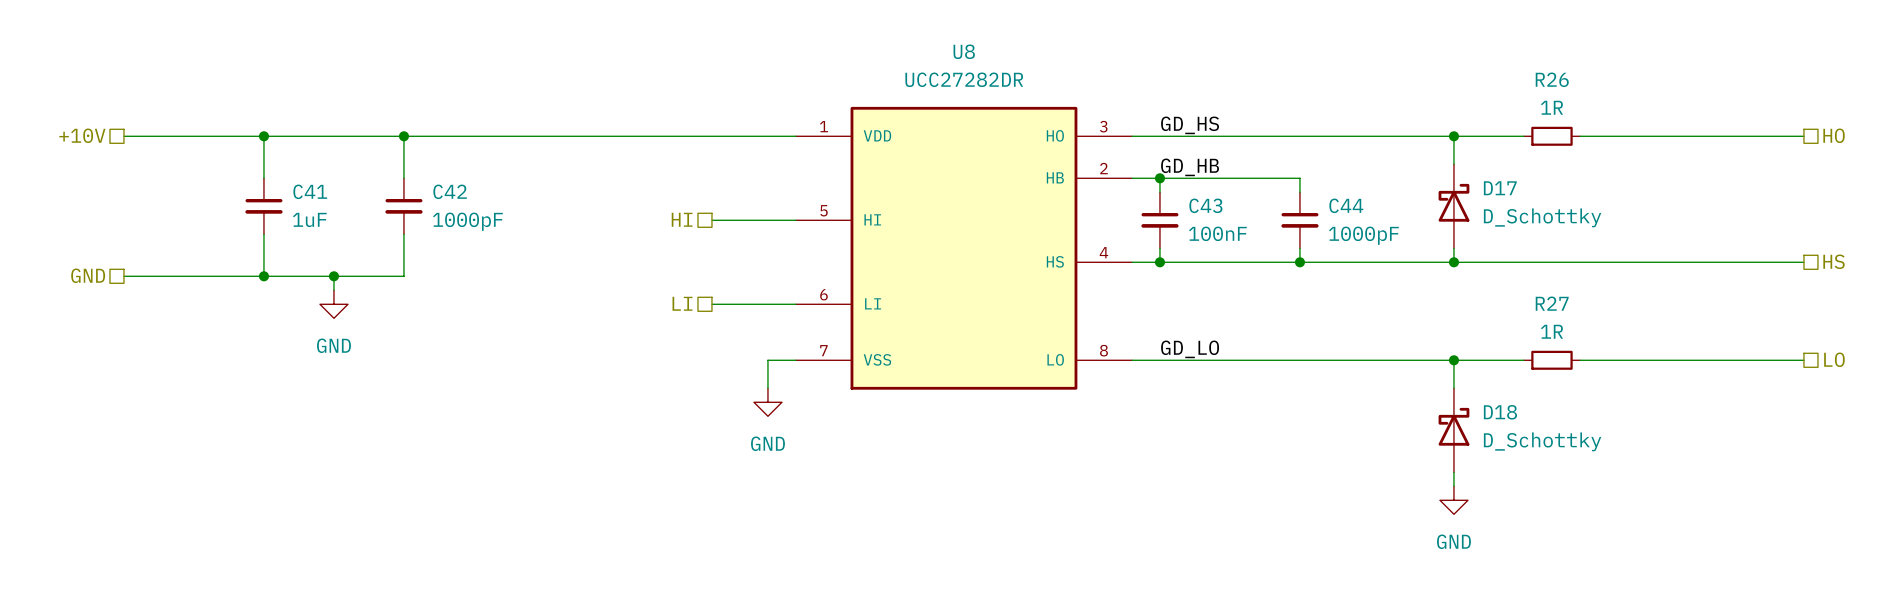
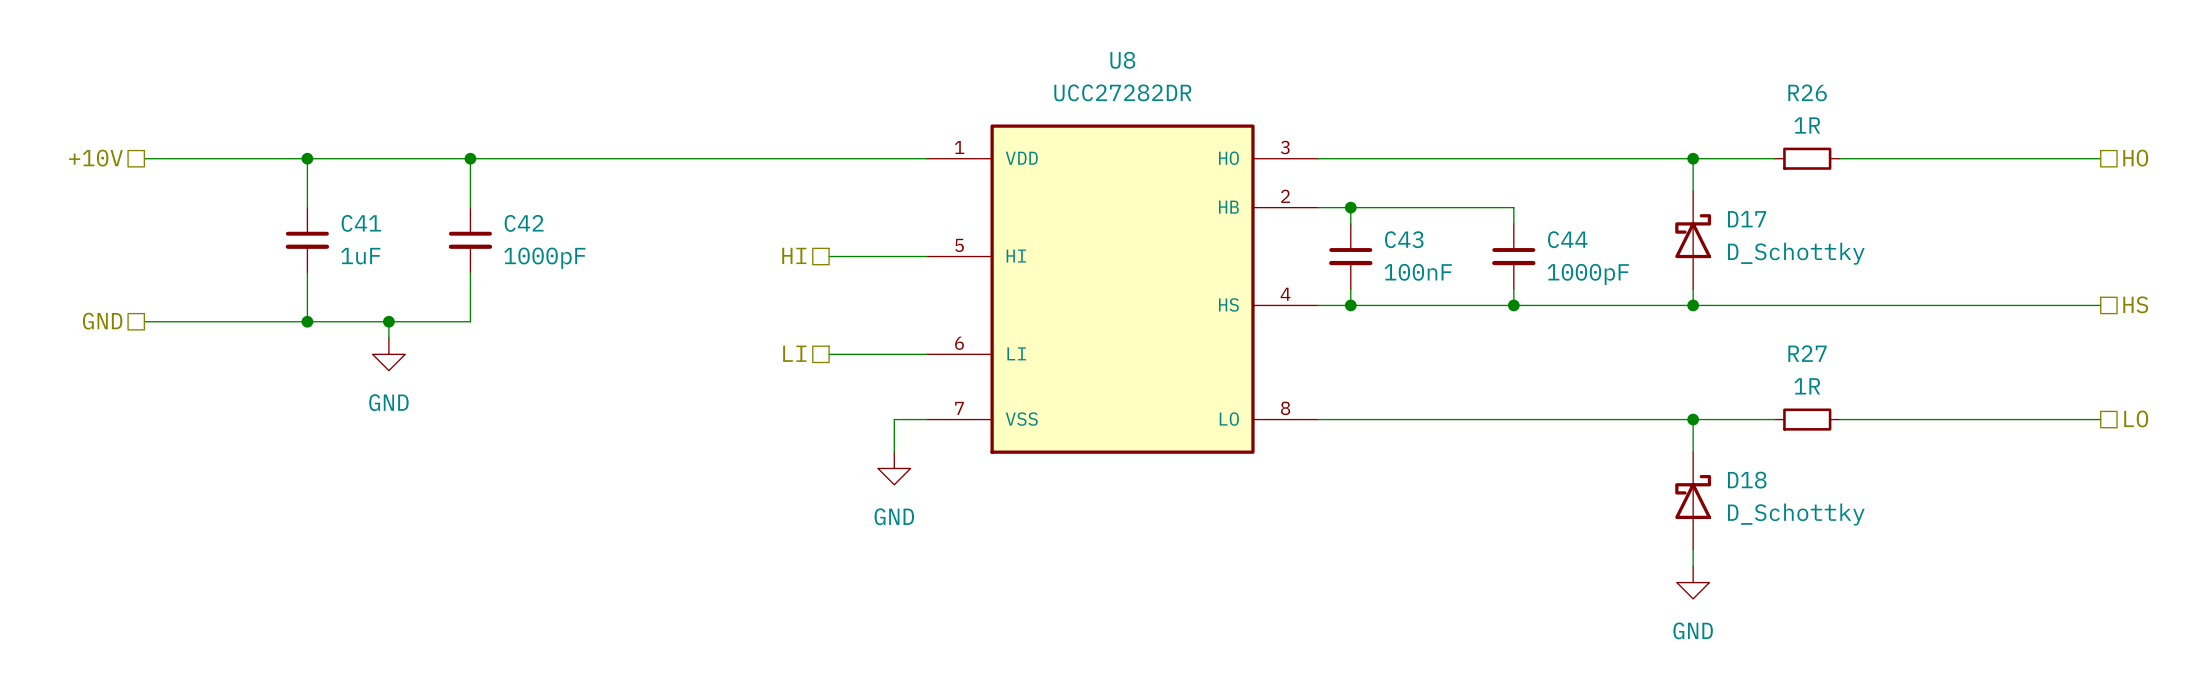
label: GD_HS (1190, 125) -> none
label: GD_HB (1190, 167) -> none
label: GD_LO (1190, 349) -> none

